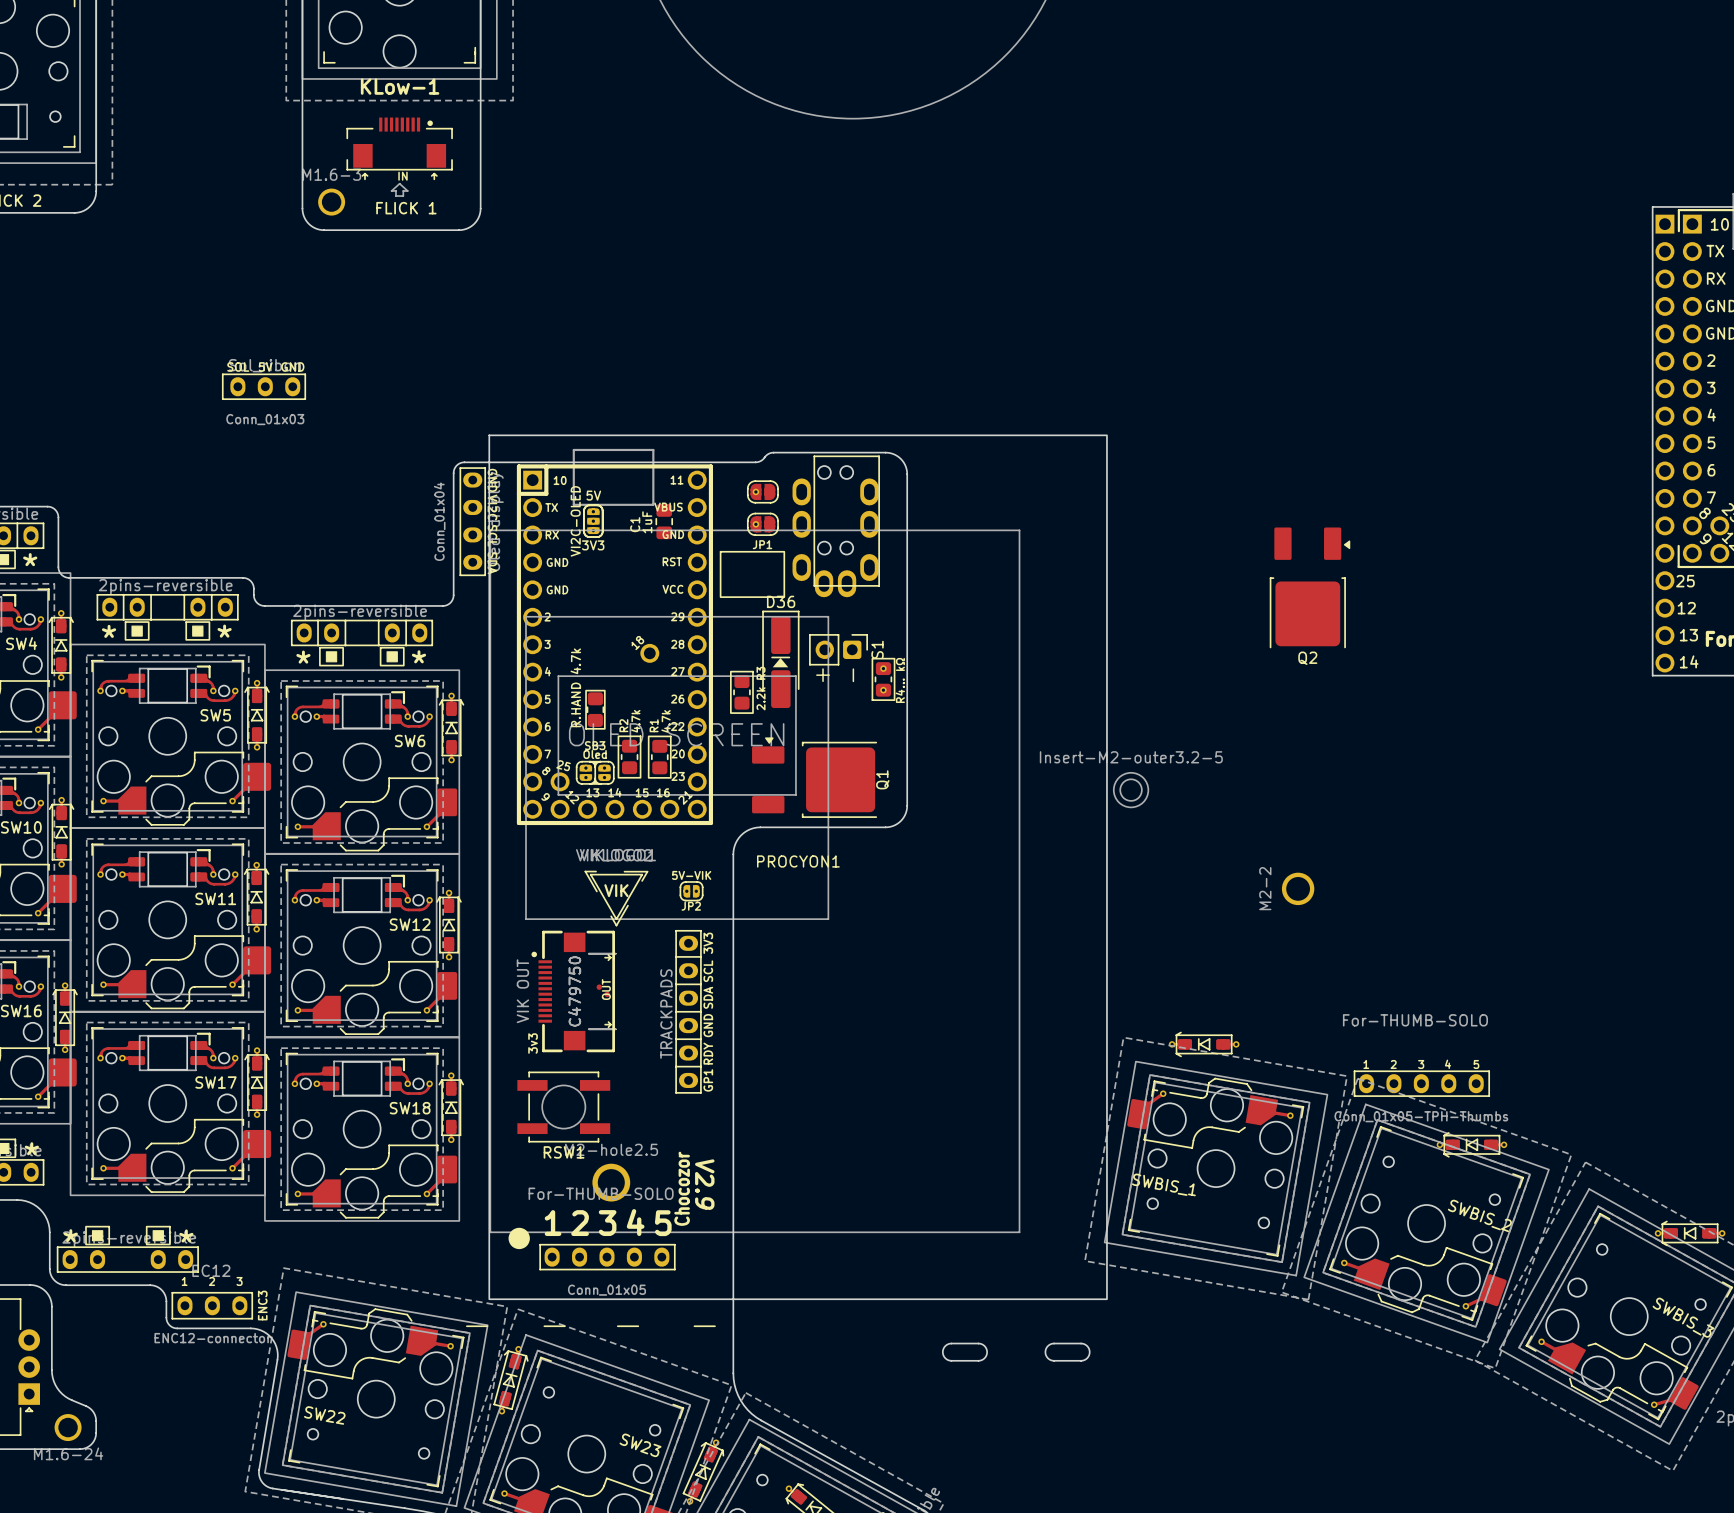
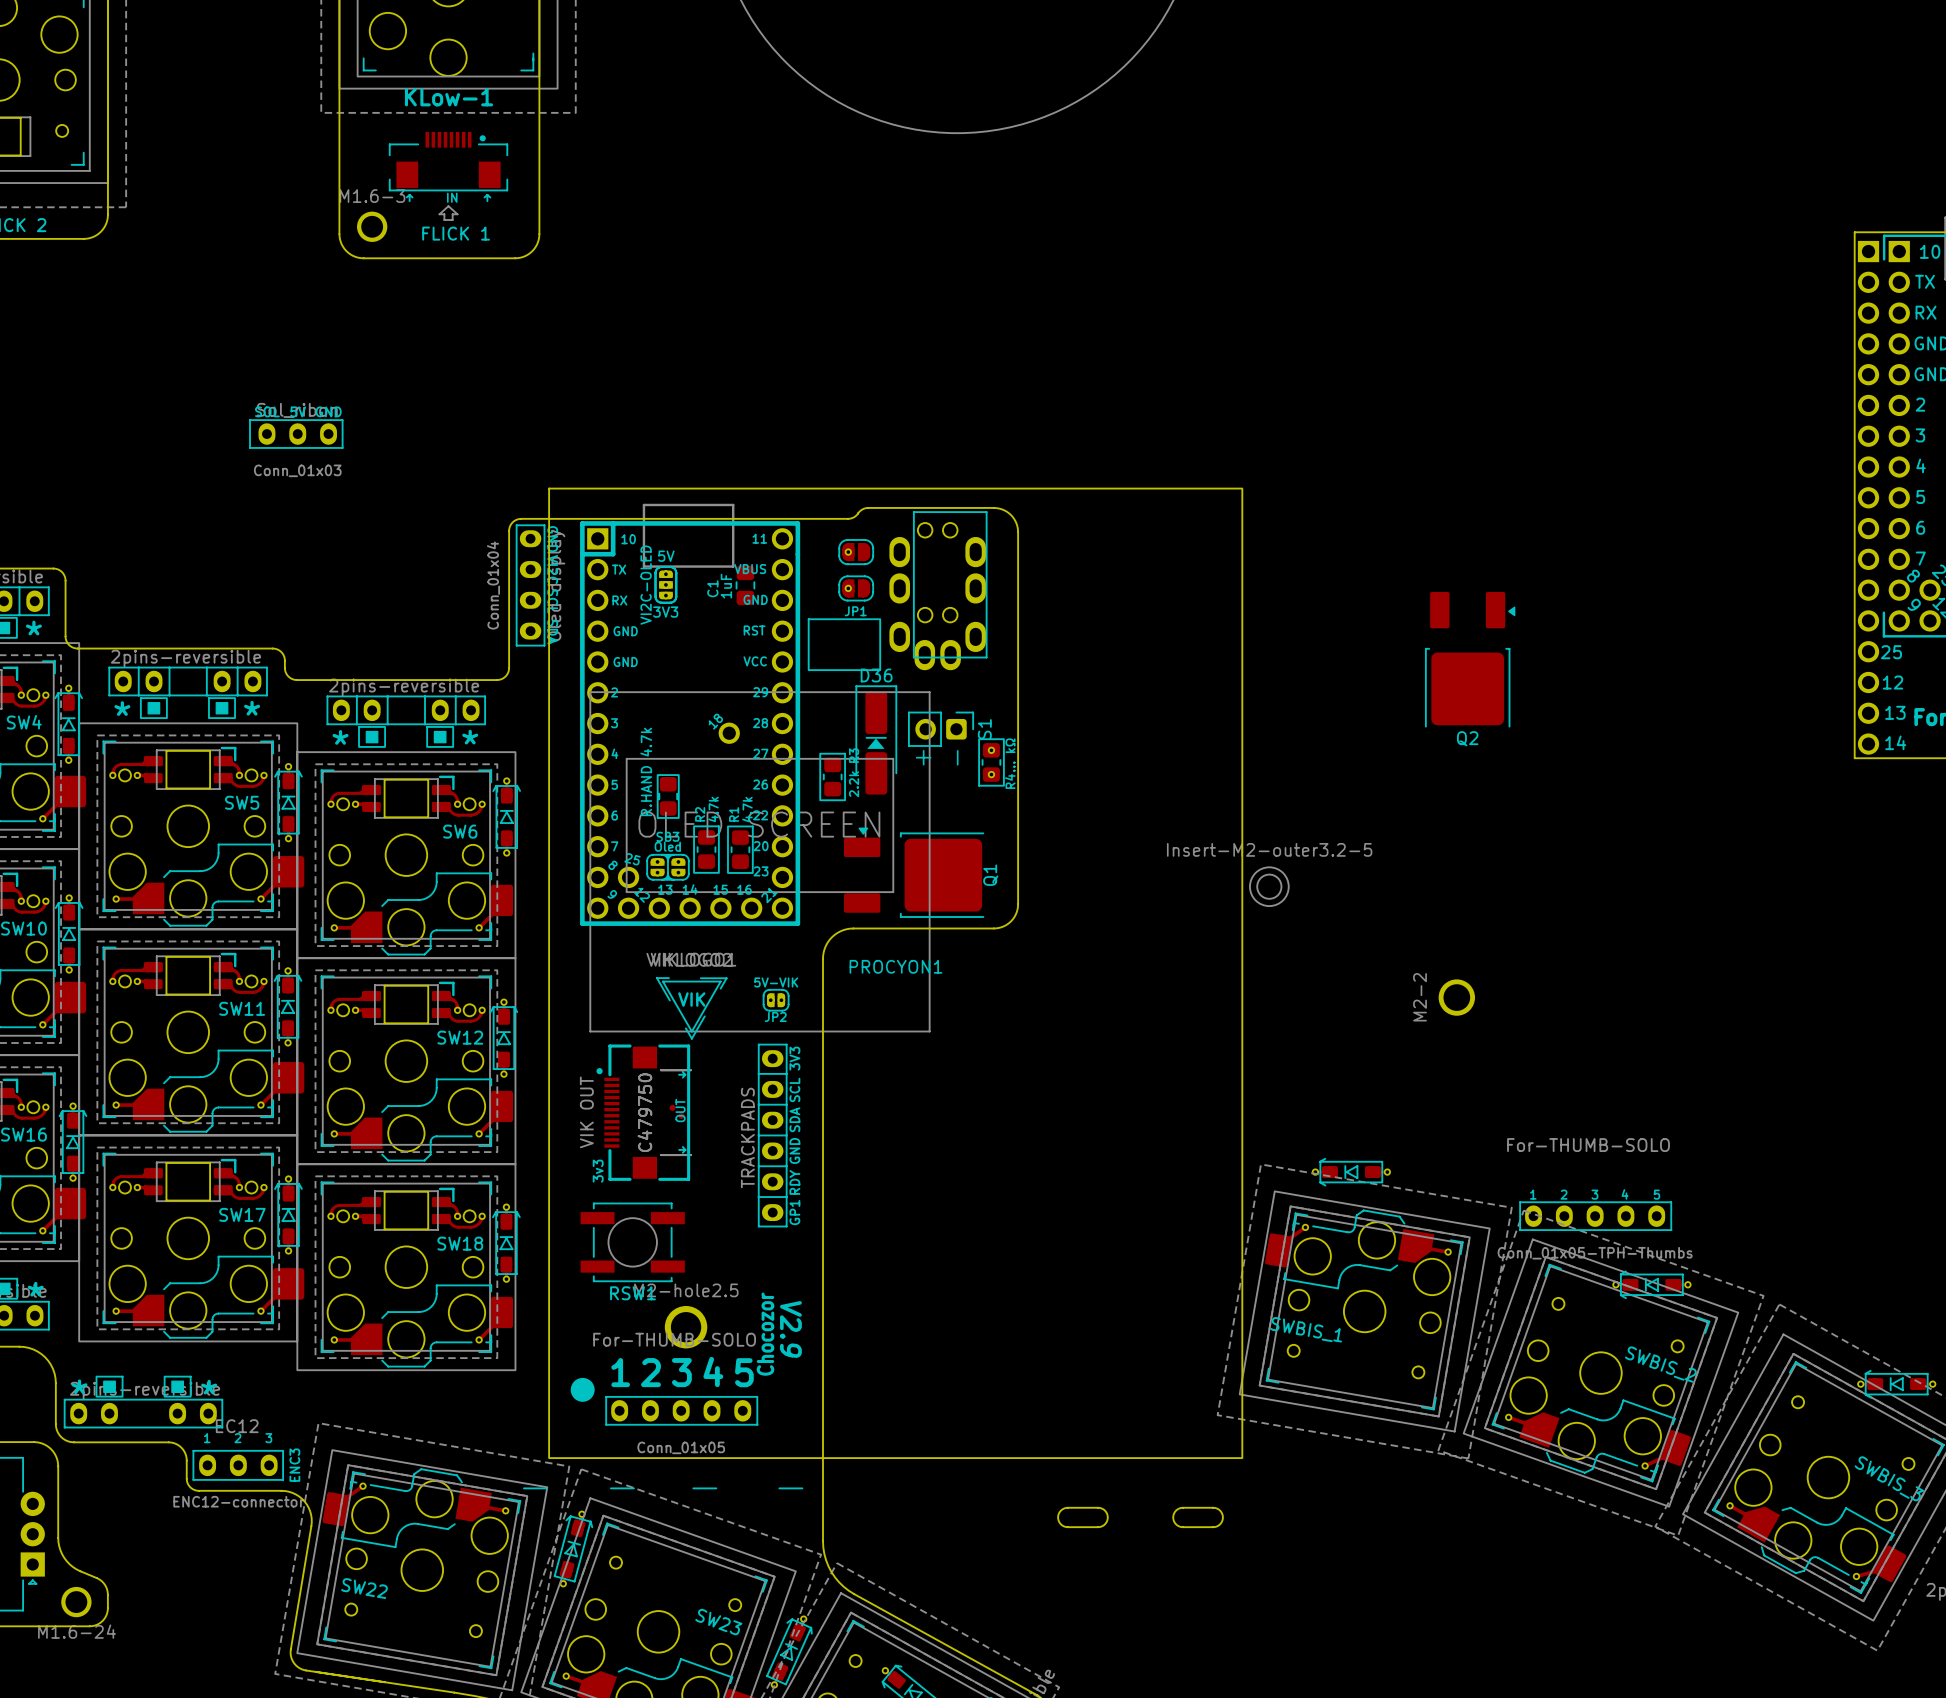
line: (490, 530) (1019, 530) (1019, 1232) (490, 1232) (490, 530) -> none

